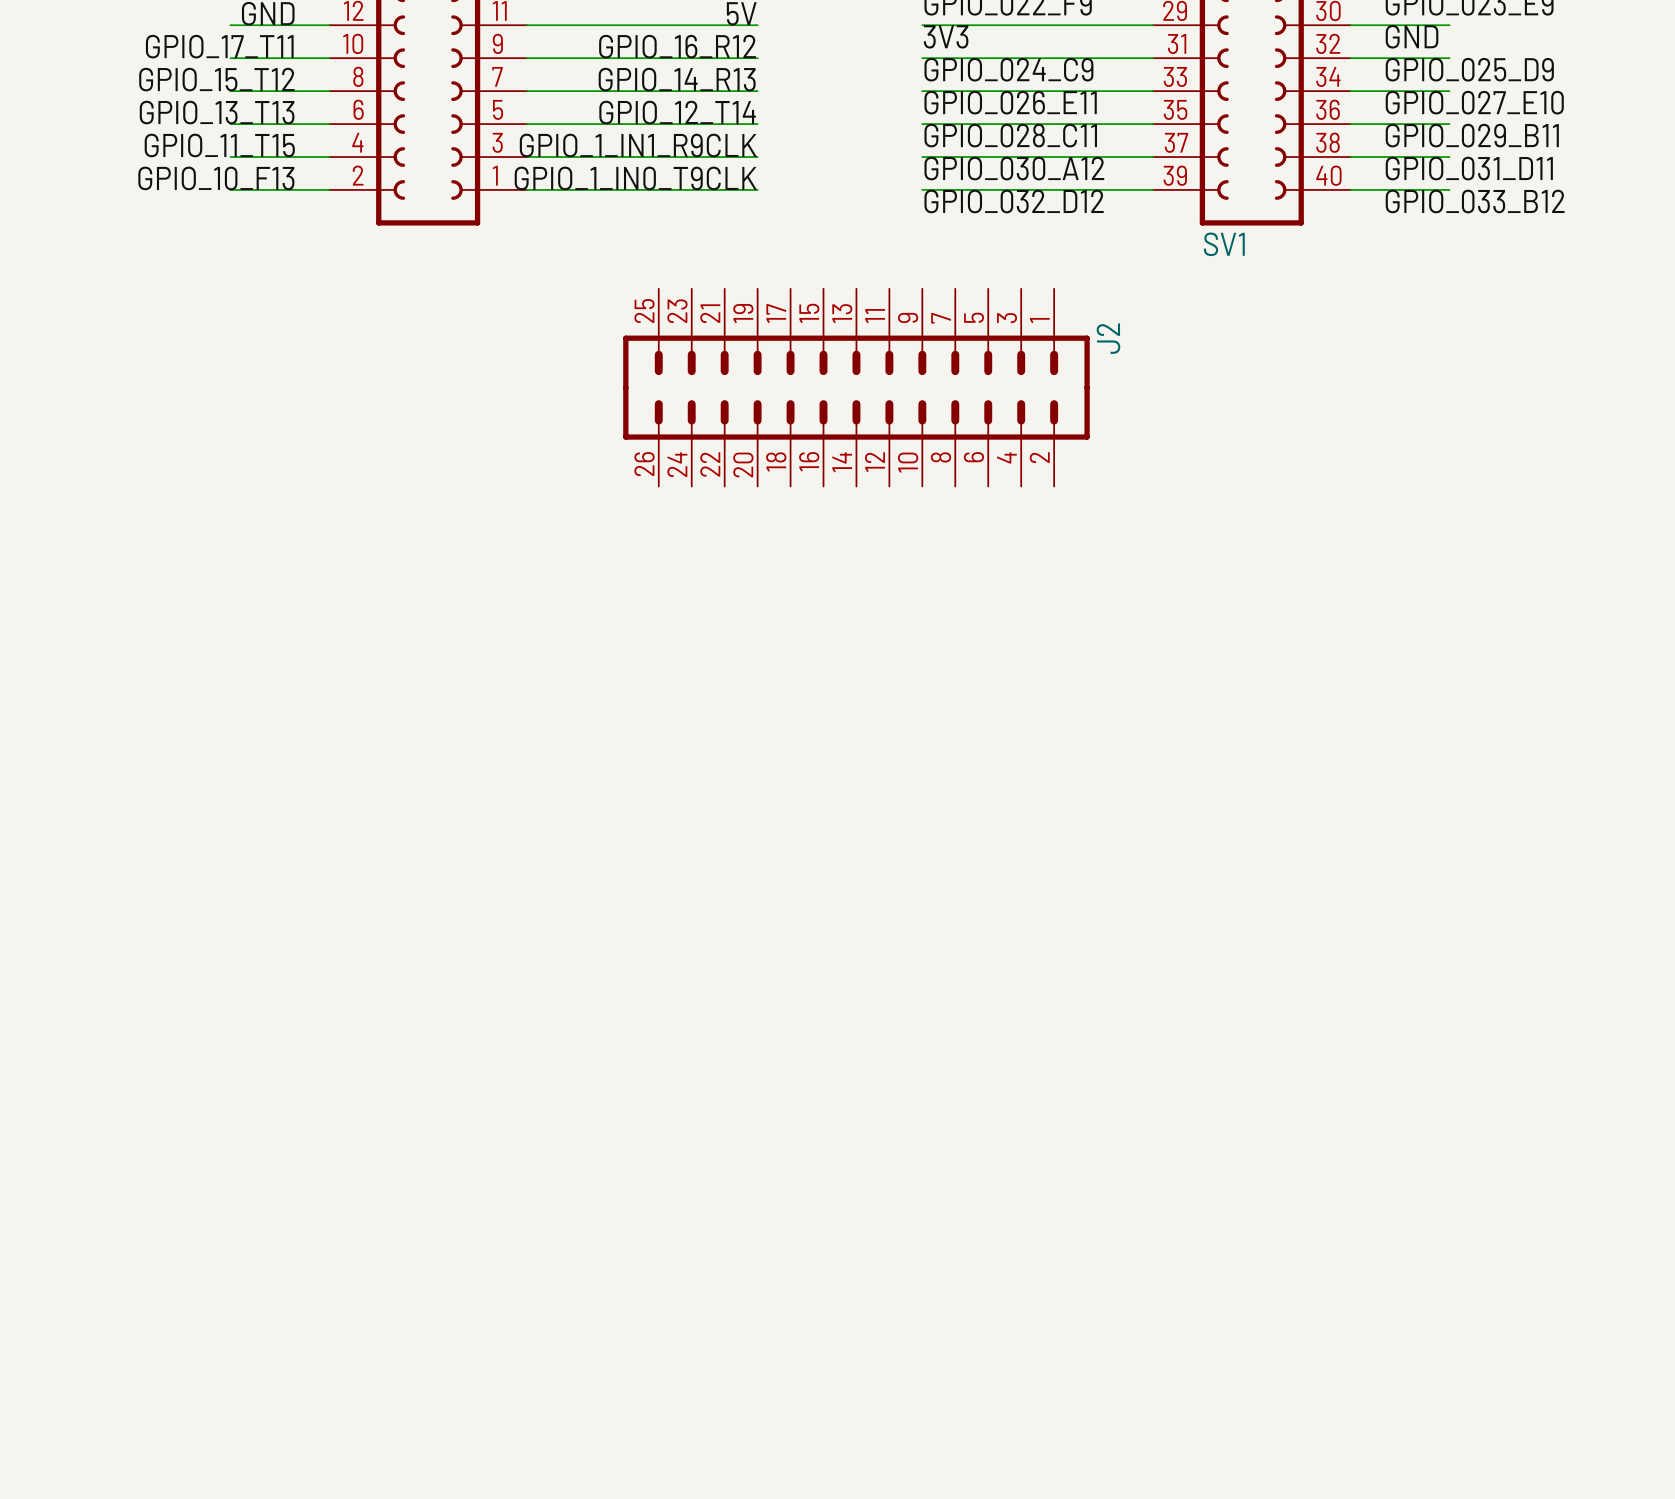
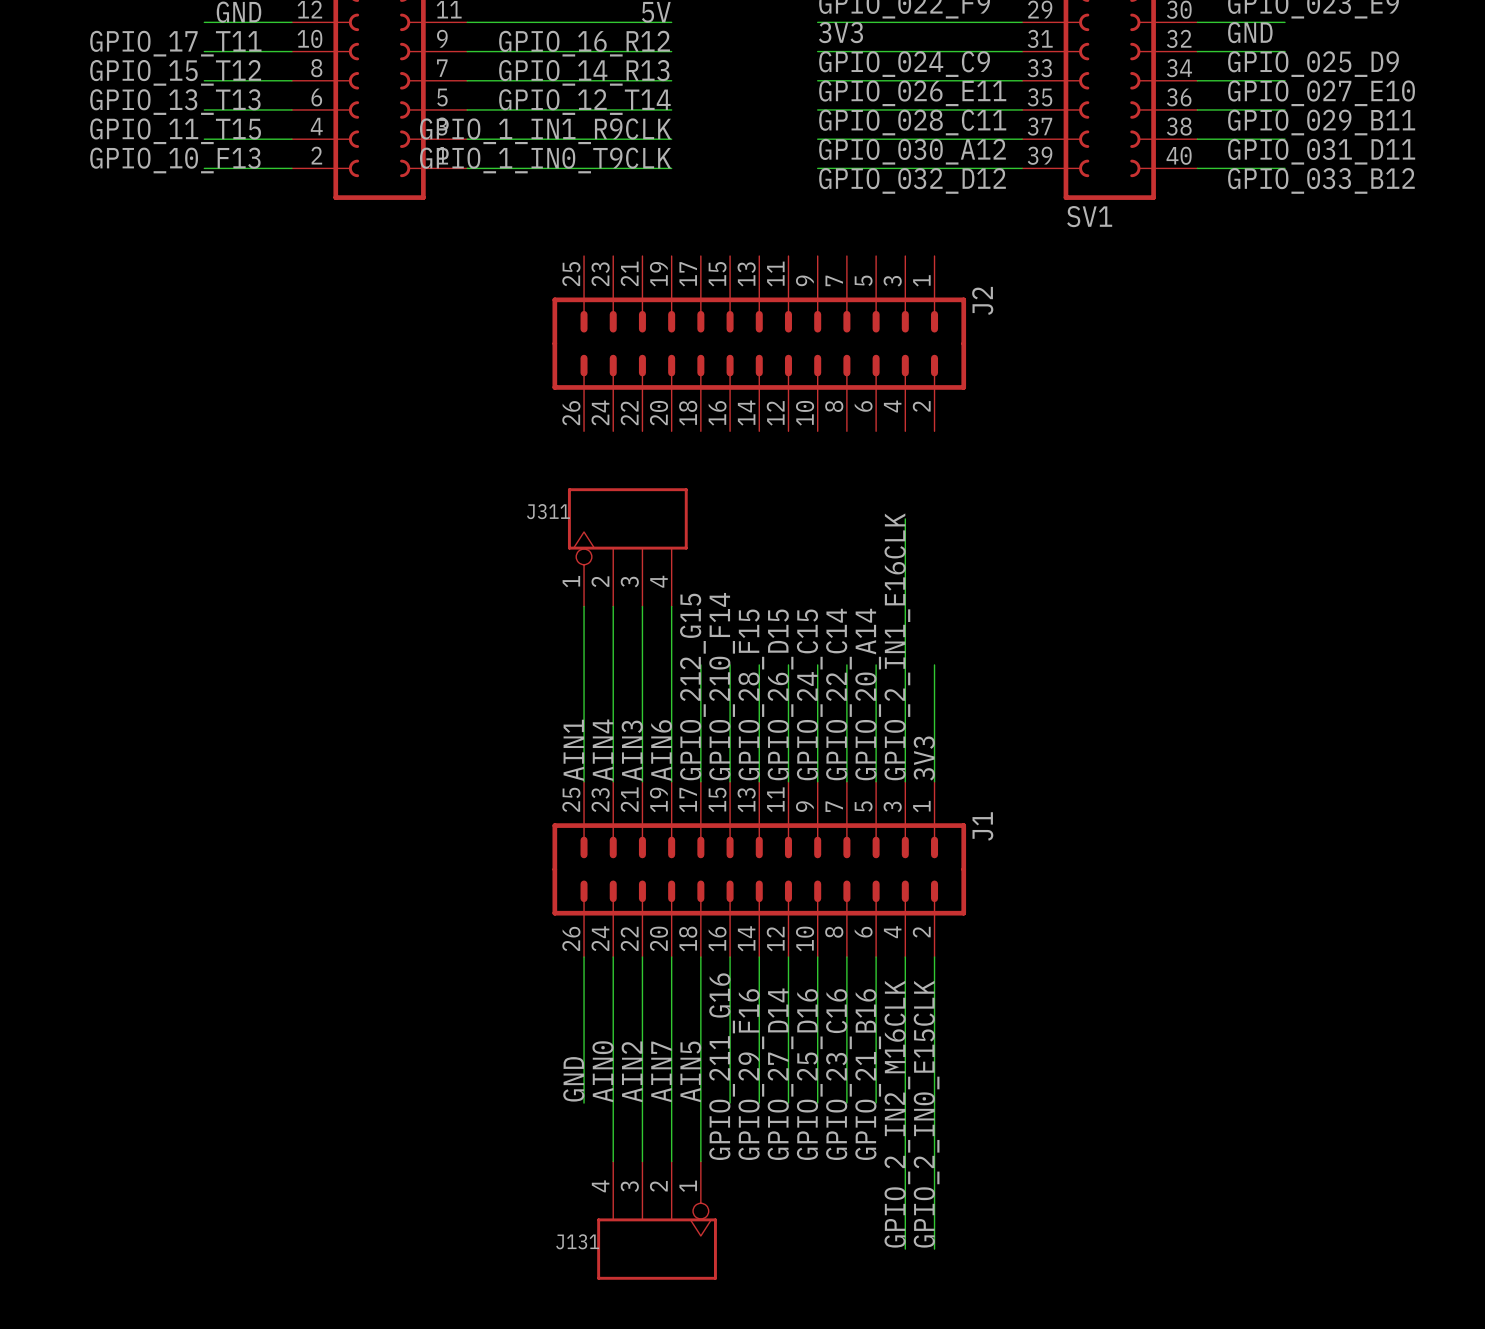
wire: none -> (905, 518) (905, 781)
J311: none -> (627, 547)
wire: none -> (584, 606) (584, 781)
wire: none -> (613, 606) (613, 781)
wire: none -> (642, 606) (642, 781)
wire: none -> (671, 606) (671, 781)
wire: none -> (700, 664) (700, 781)
wire: none -> (730, 664) (730, 781)
wire: none -> (759, 664) (759, 781)
wire: none -> (788, 664) (788, 781)
wire: none -> (817, 664) (817, 781)
wire: none -> (846, 664) (846, 781)
wire: none -> (876, 664) (876, 781)
wire: none -> (934, 664) (934, 781)
label: none -> GPIO_2_IN1_E16CLK (897, 646)
label: none -> GPIO_212_G15 (692, 687)
label: none -> GPIO_210_F14 (722, 686)
label: none -> GPIO_20_A14 (868, 694)
label: none -> GPIO_26_D15 (780, 694)
label: none -> GPIO_24_C15 (809, 694)
label: none -> GPIO_22_C14 (838, 694)
label: none -> GPIO_28_F15 (751, 694)
label: none -> AIN4 (603, 750)
label: none -> AIN3 (632, 750)
label: none -> AIN6 (661, 750)
label: none -> AIN1 (573, 750)
label: none -> 3V3 (924, 758)
J1: none -> (759, 869)
wire: none -> (584, 957) (584, 1103)
wire: none -> (613, 957) (613, 1161)
wire: none -> (642, 957) (642, 1161)
wire: none -> (671, 957) (671, 1161)
wire: none -> (700, 957) (700, 1161)
wire: none -> (730, 957) (730, 1103)
wire: none -> (759, 957) (759, 1103)
wire: none -> (788, 957) (788, 1103)
wire: none -> (817, 957) (817, 1103)
wire: none -> (846, 957) (846, 1103)
wire: none -> (876, 957) (876, 1103)
wire: none -> (905, 957) (905, 1249)
wire: none -> (934, 957) (934, 1249)
label: none -> AIN0 (603, 1071)
label: none -> AIN2 (632, 1071)
label: none -> AIN7 (661, 1071)
label: none -> AIN5 (690, 1071)
label: none -> GND (573, 1079)
label: none -> GPIO_211_G16 (722, 1066)
label: none -> GPIO_25_D16 (809, 1074)
label: none -> GPIO_29_F16 (751, 1074)
label: none -> GPIO_27_D14 (780, 1074)
label: none -> GPIO_23_C16 (838, 1074)
label: none -> GPIO_21_B16 (868, 1074)
label: none -> GPIO_2_IN2_M16CLK (897, 1114)
label: none -> GPIO_2_IN0_E15CLK (926, 1114)
J131: none -> (657, 1220)

